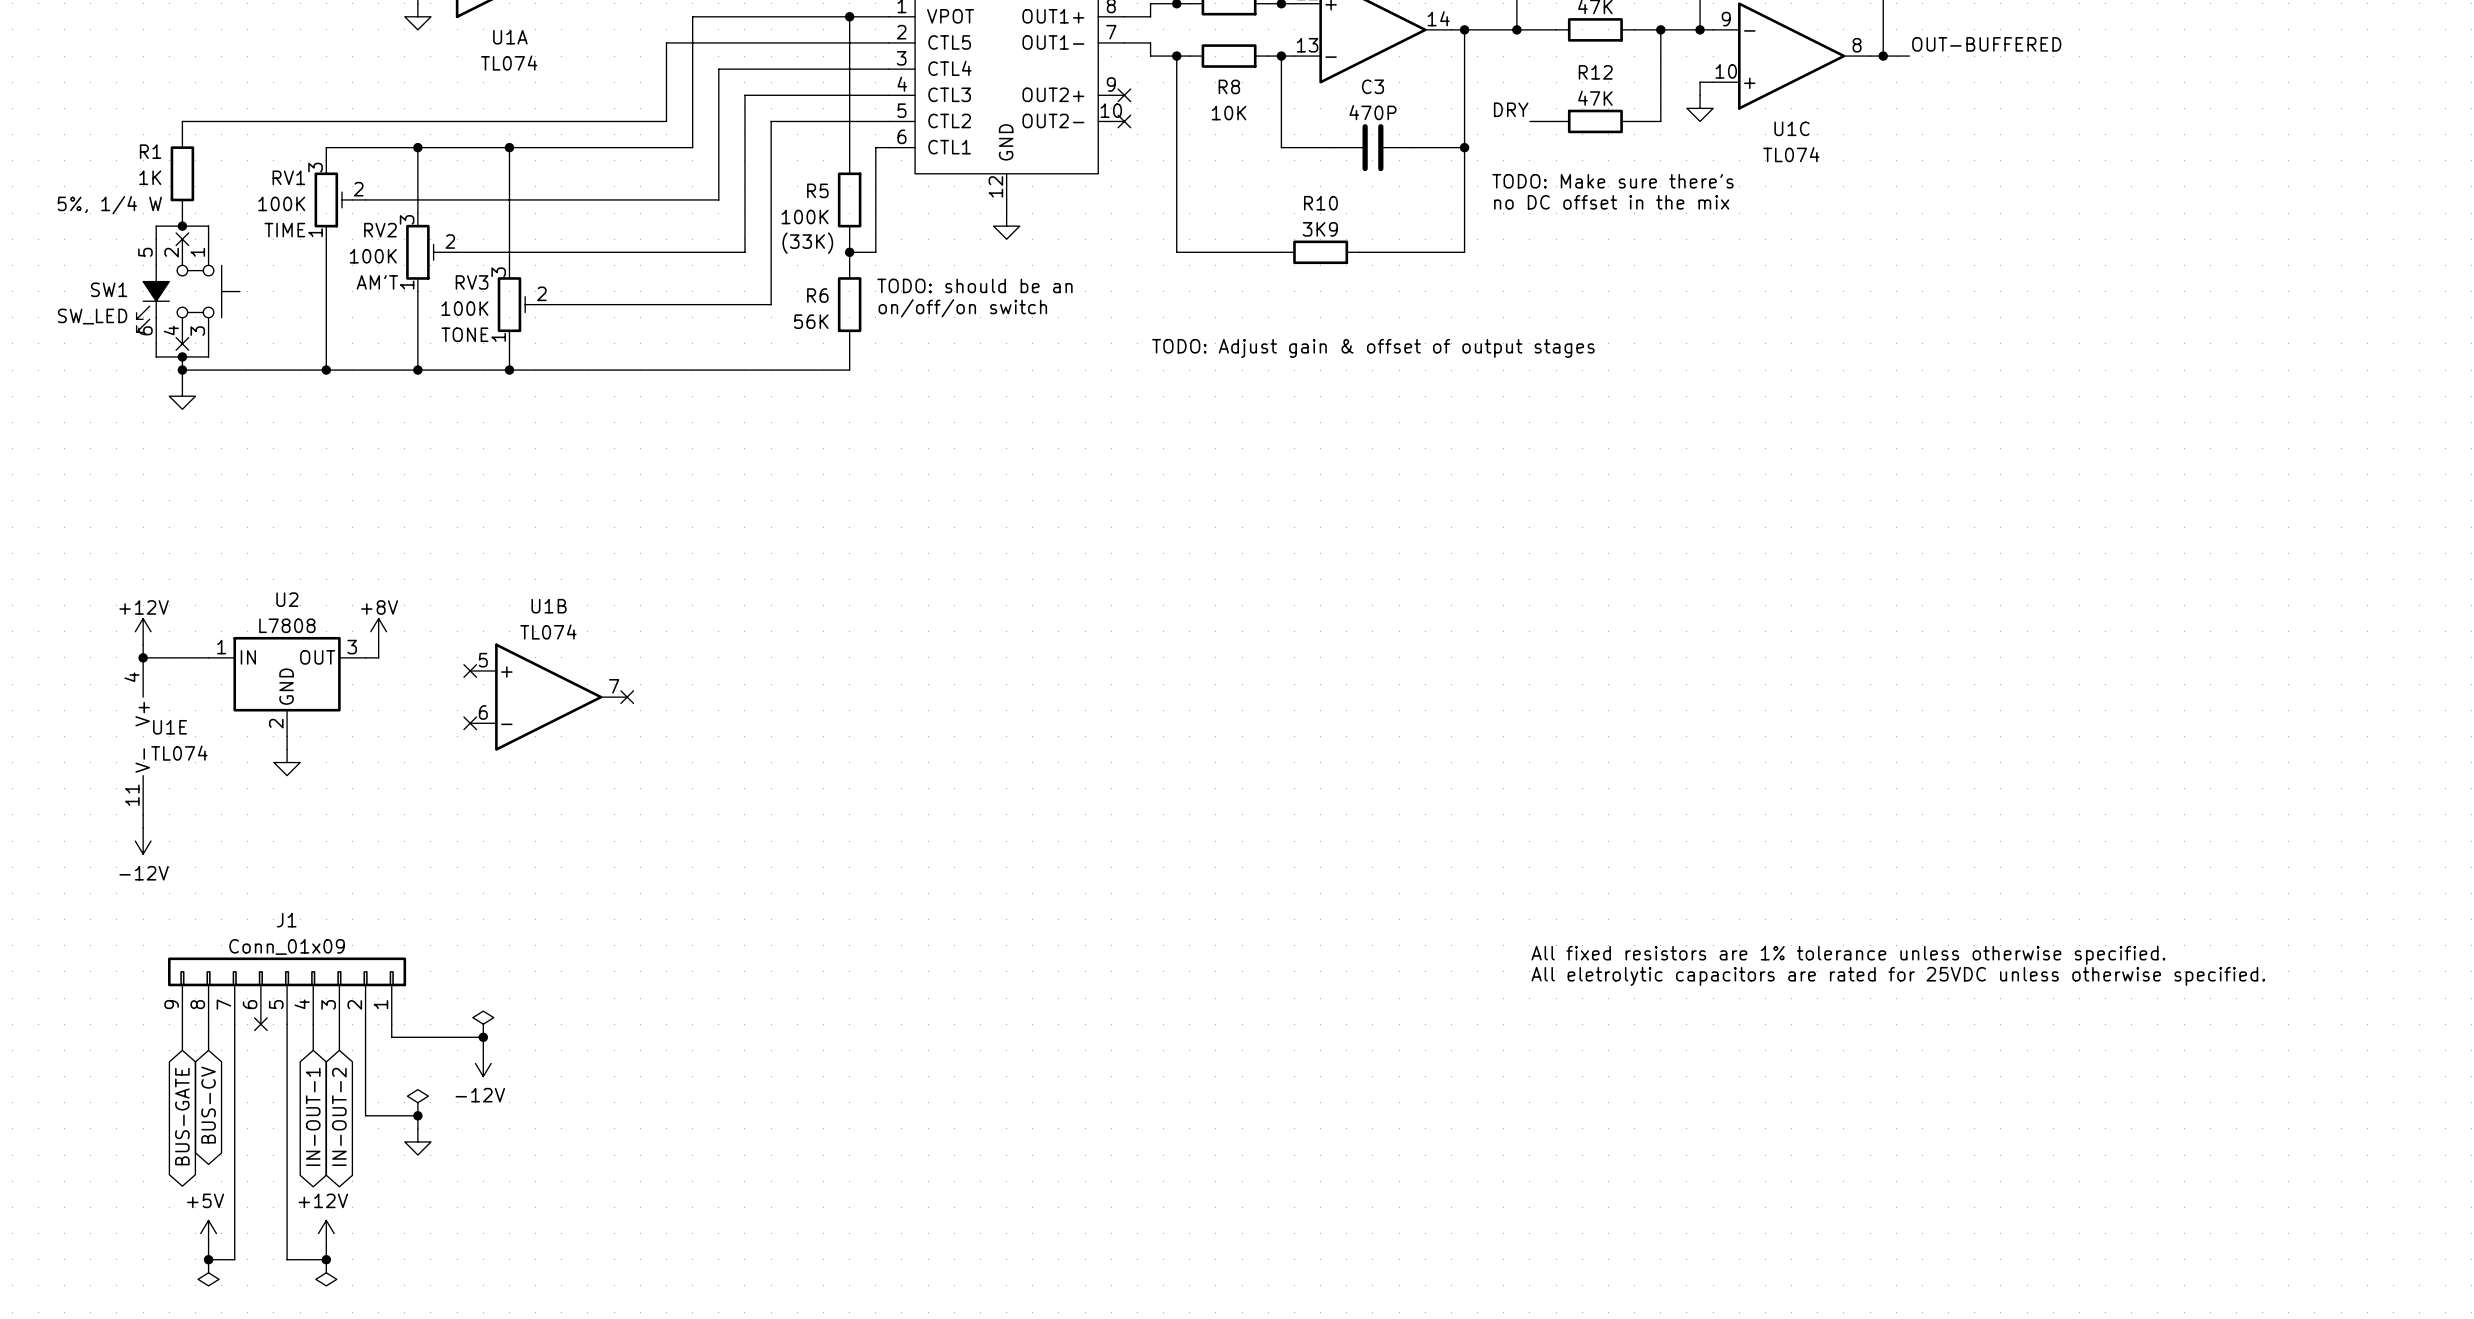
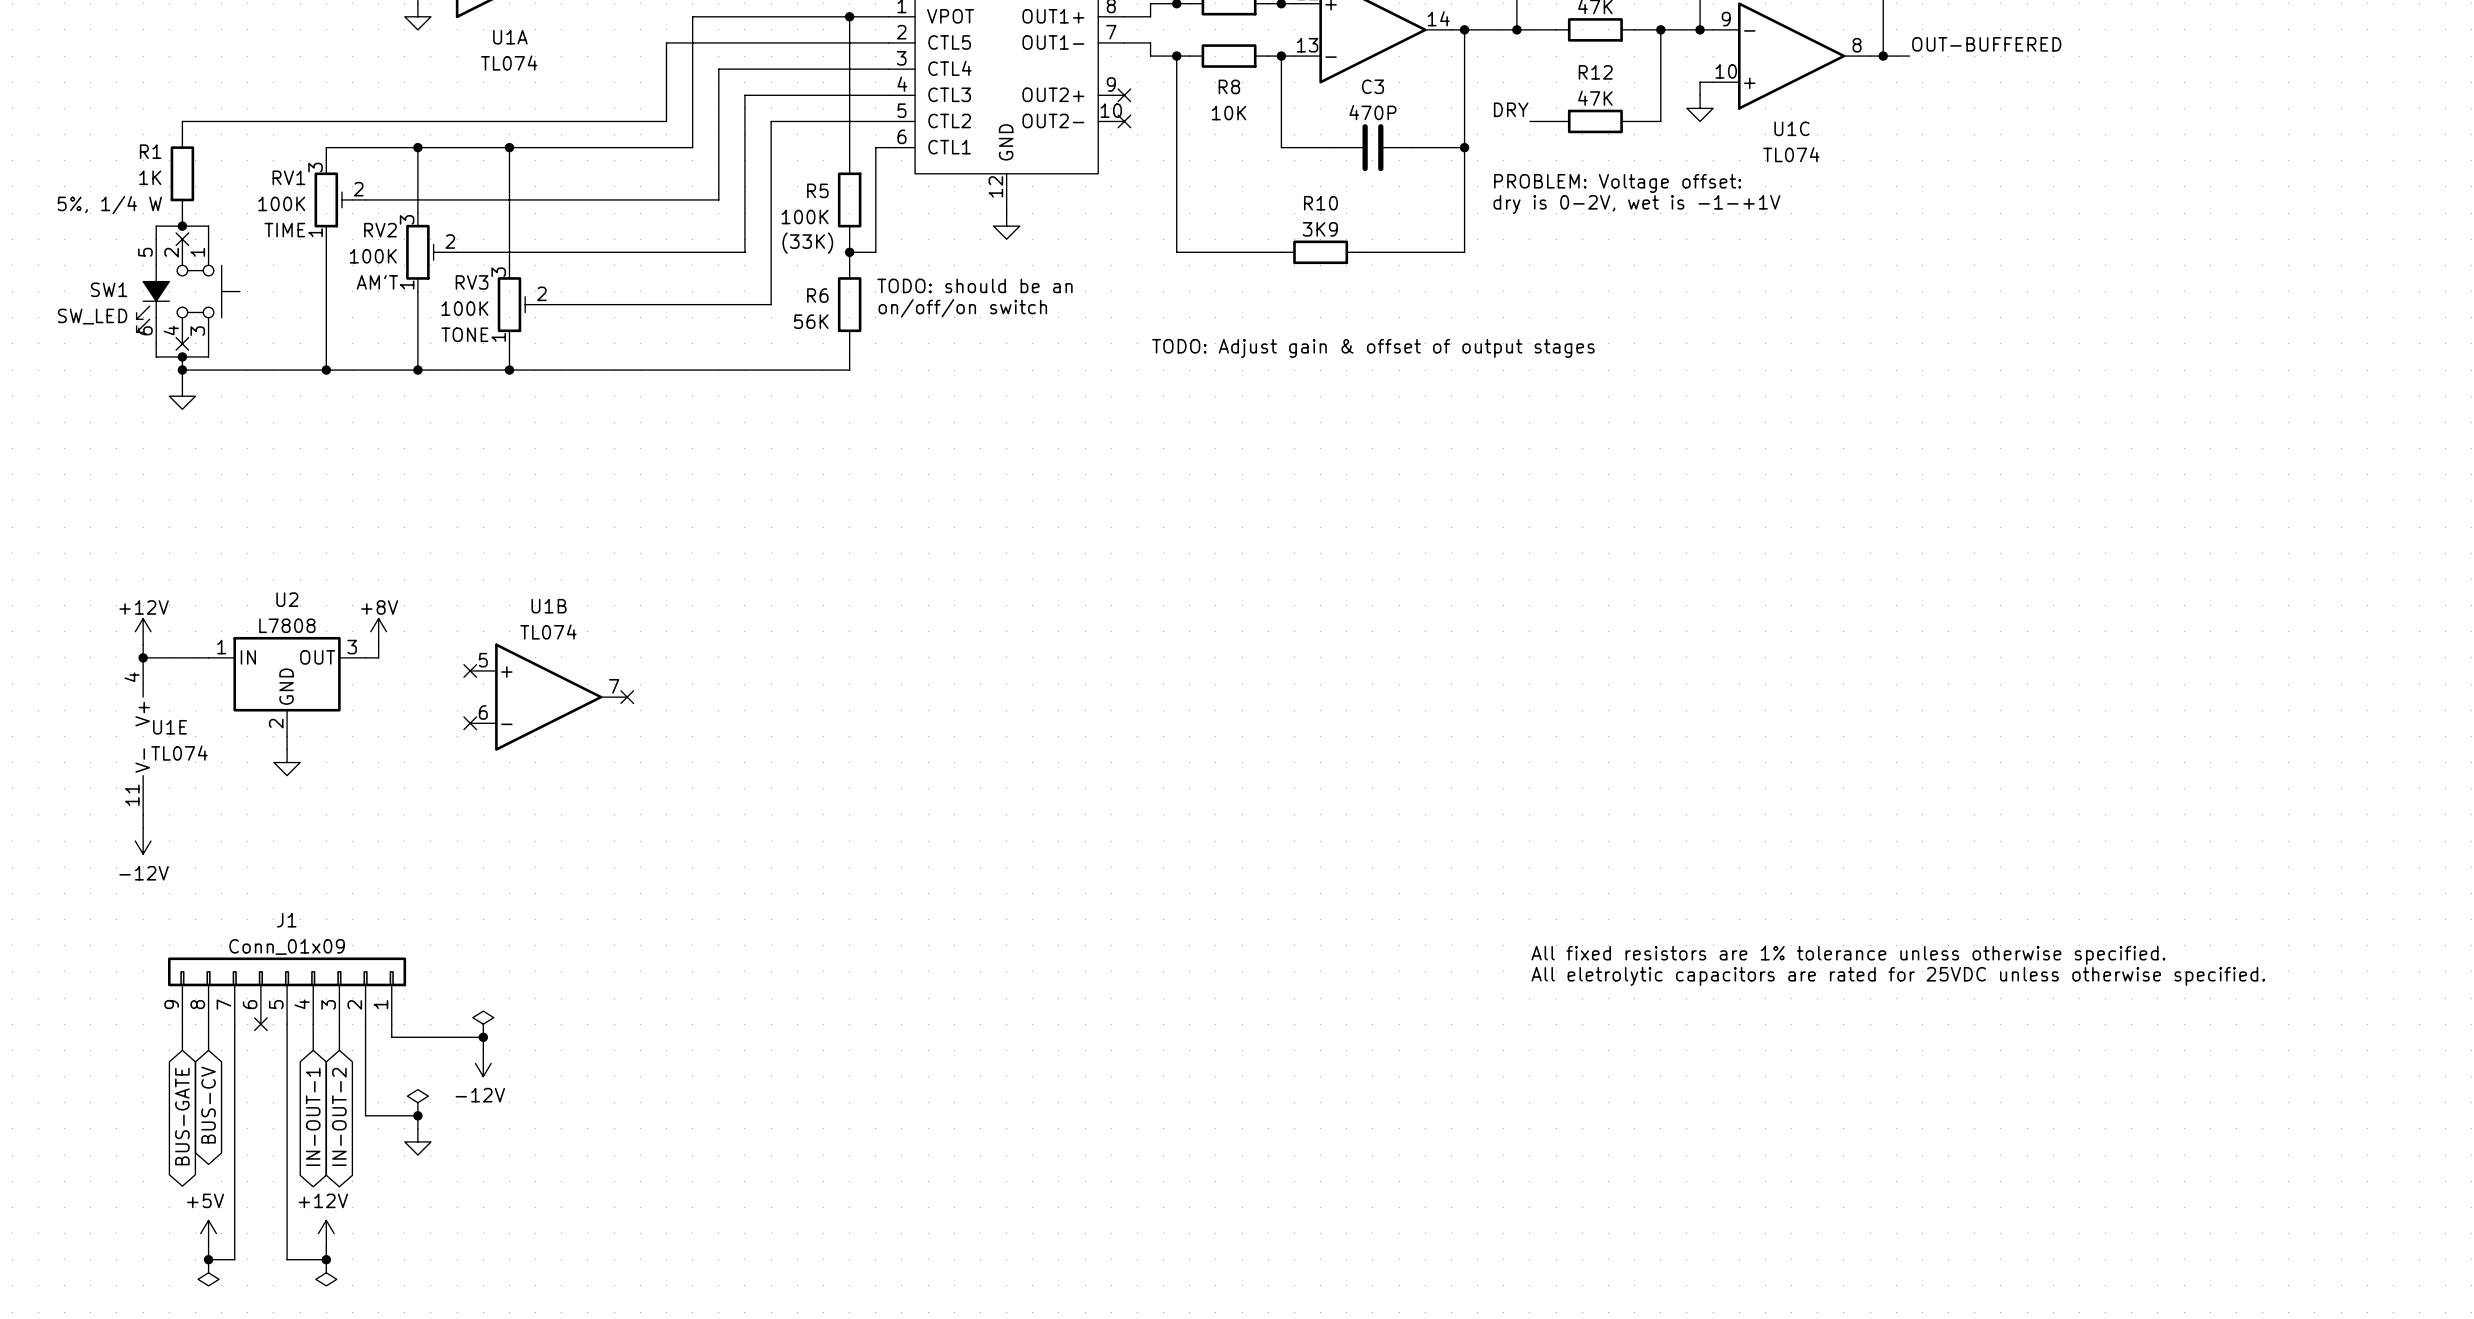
text: TODO: Make sure there's (1612, 181) -> PROBLEM: Voltage offset: (1617, 183)
text: no DC offset in the mix (1611, 202) -> dry is 0-2V, wet is -1-+1V (1636, 204)

